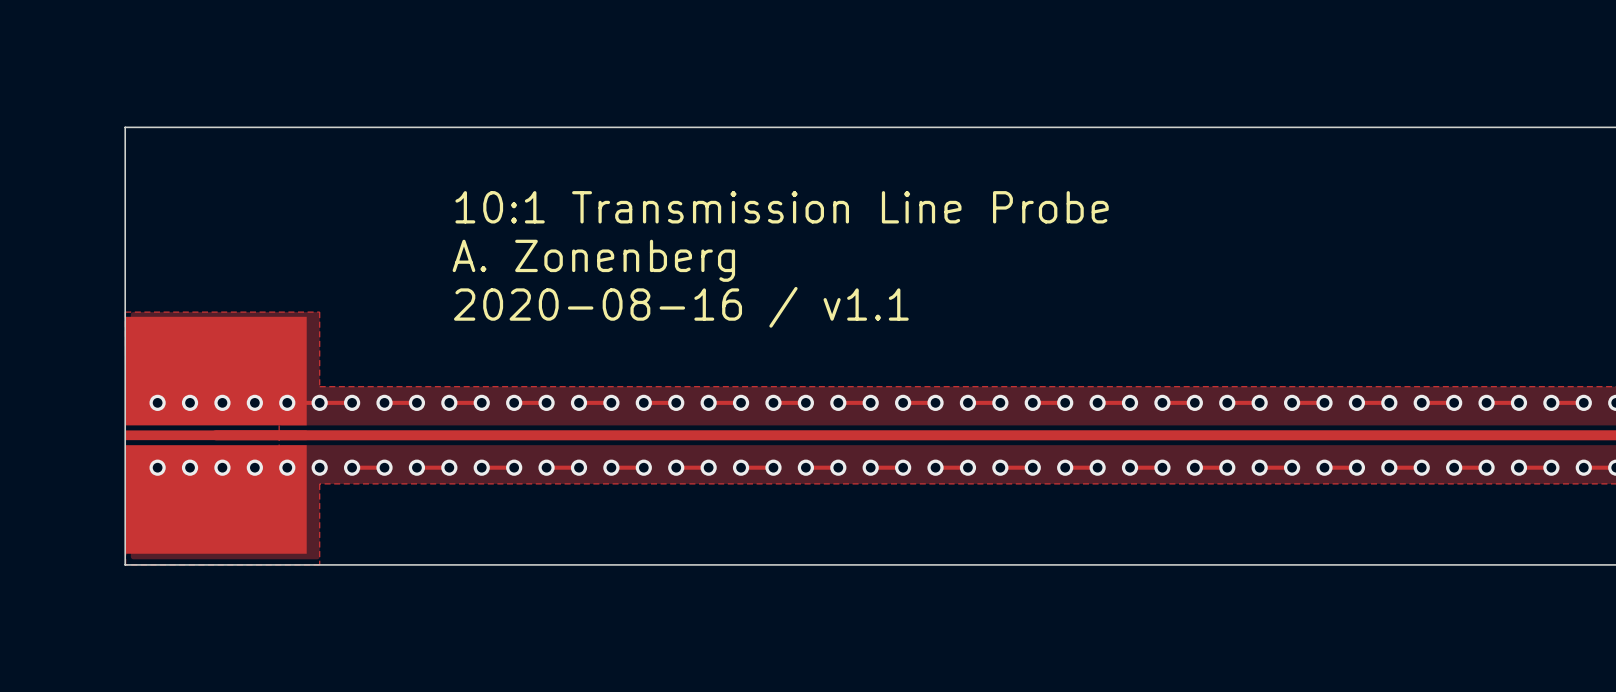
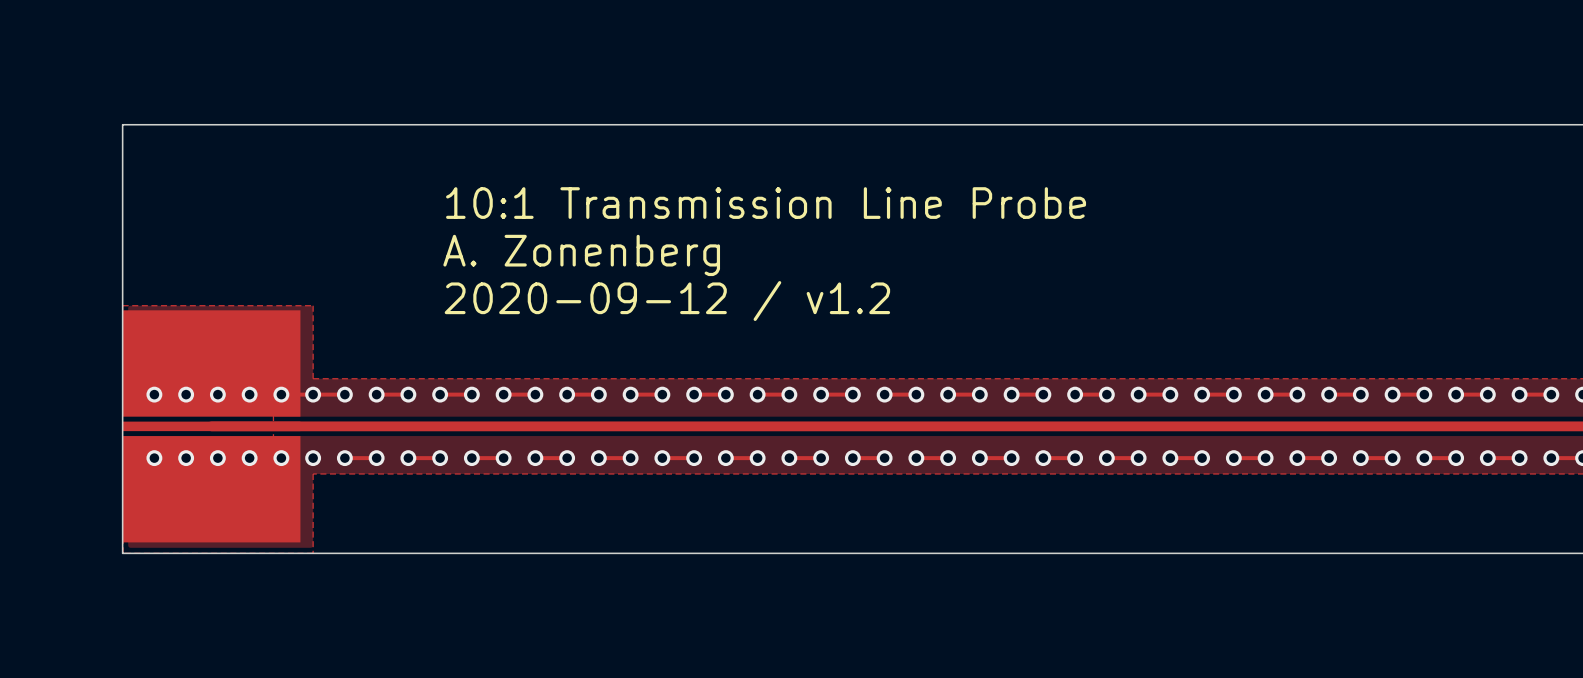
text: 2020-08-16 / v1.1 (681, 307) -> 2020-09-12 / v1.2 (667, 301)

